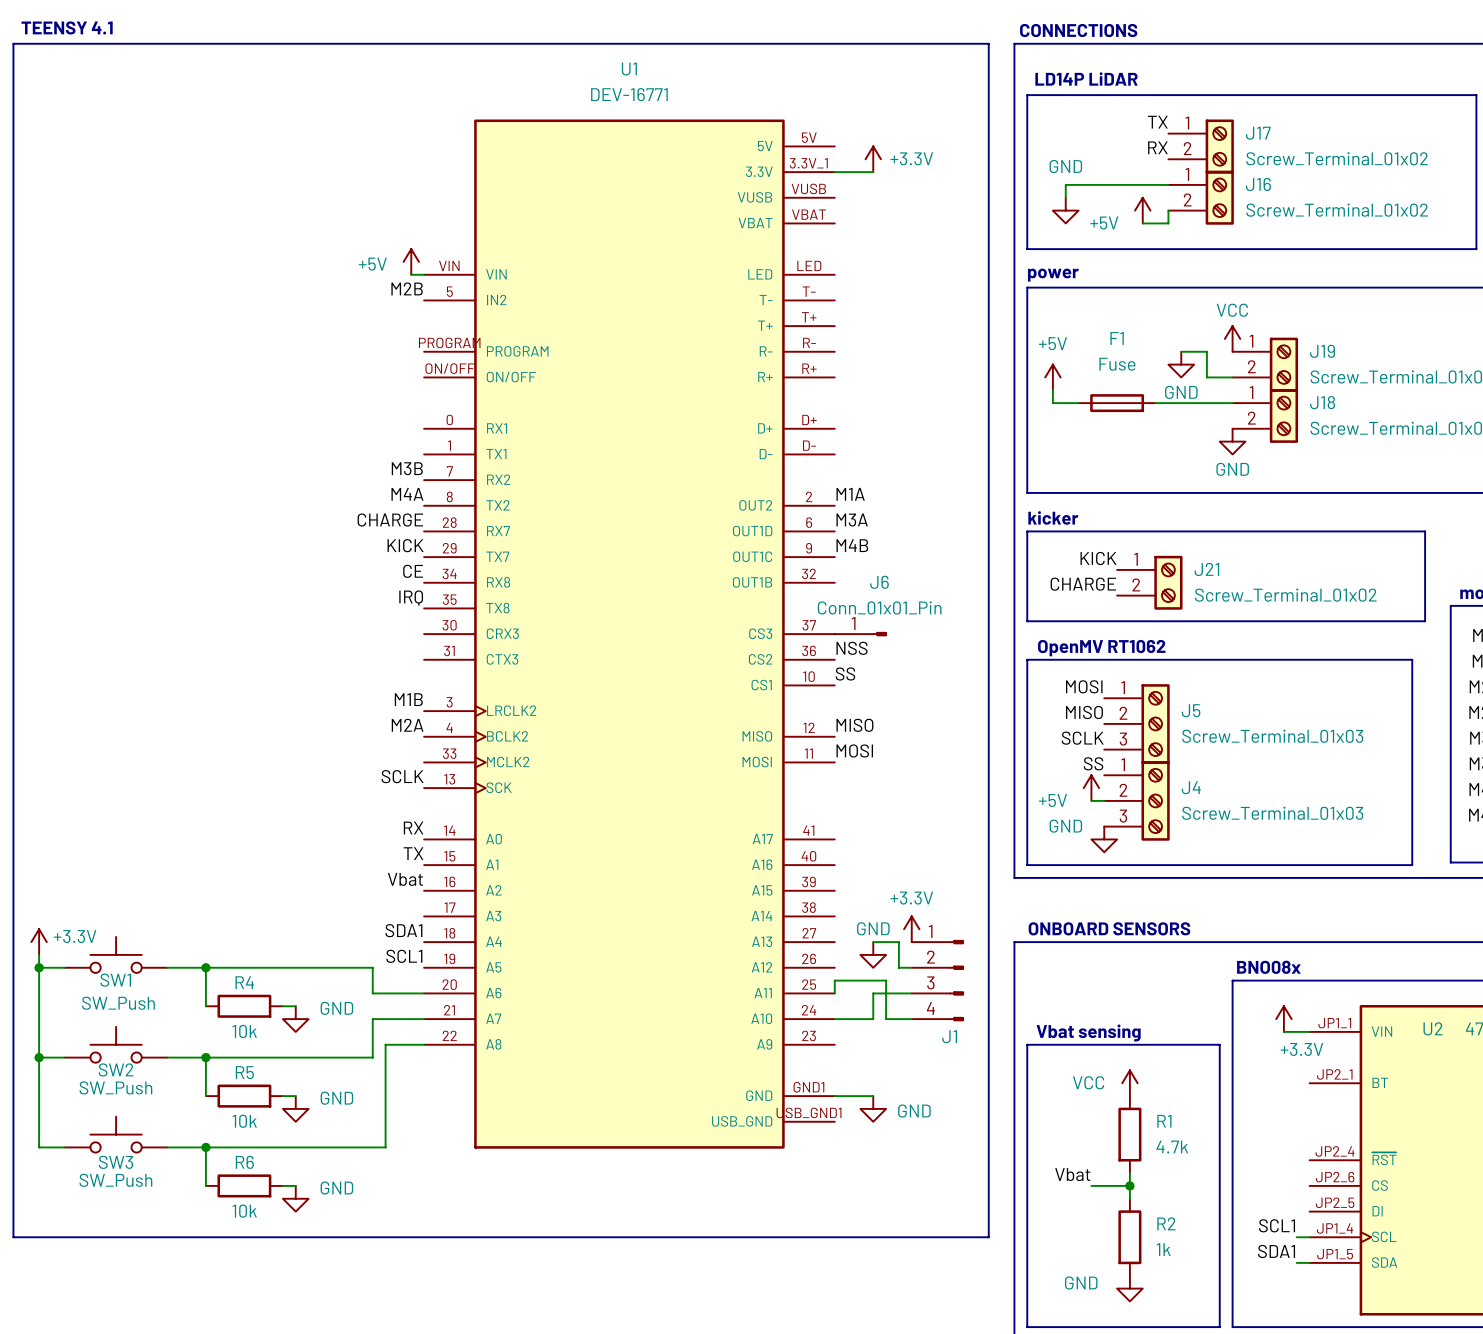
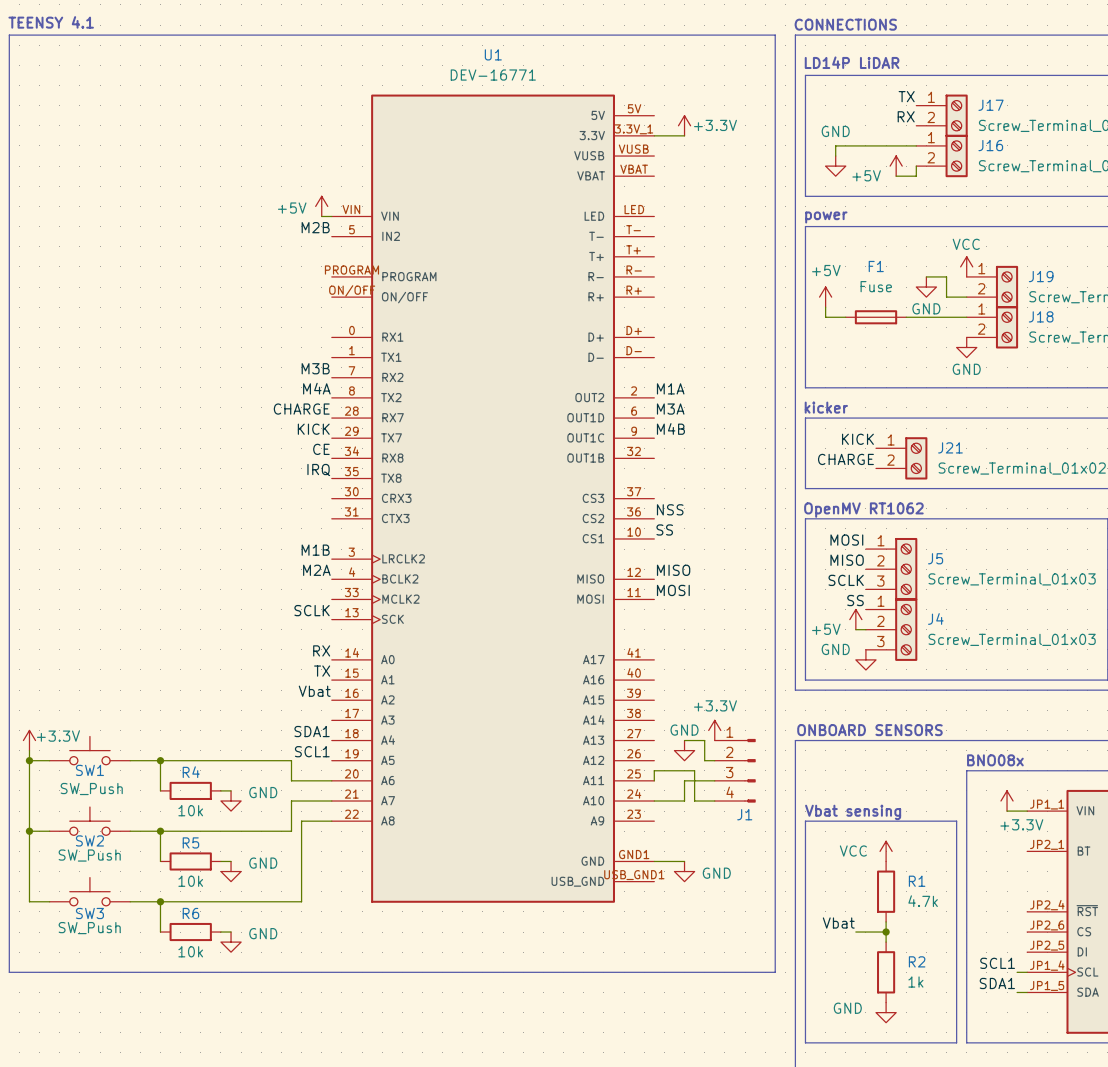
J6: Conn_01x01_Pin (860, 634) -> none

